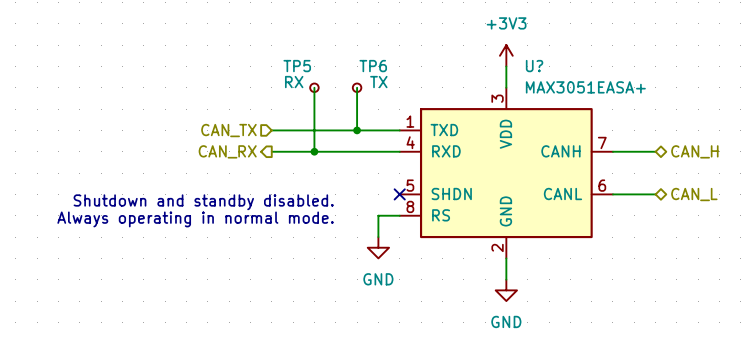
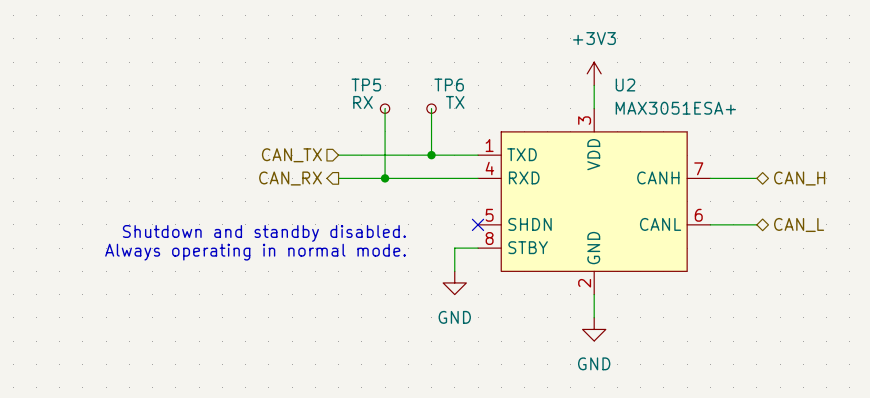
U?: MAX3051EASA+ (506, 173) -> none
U2: none -> MAX3051ESA+ (594, 201)

